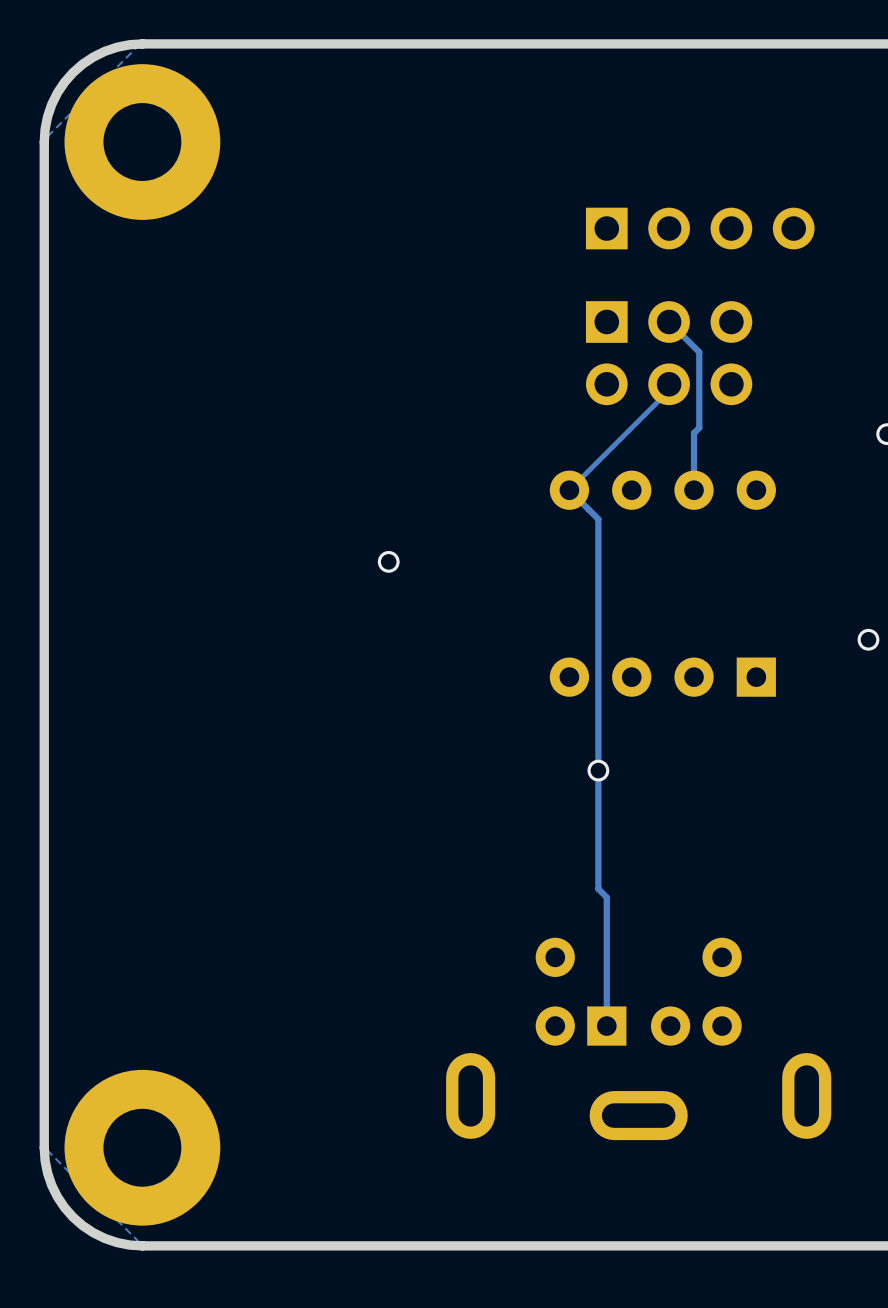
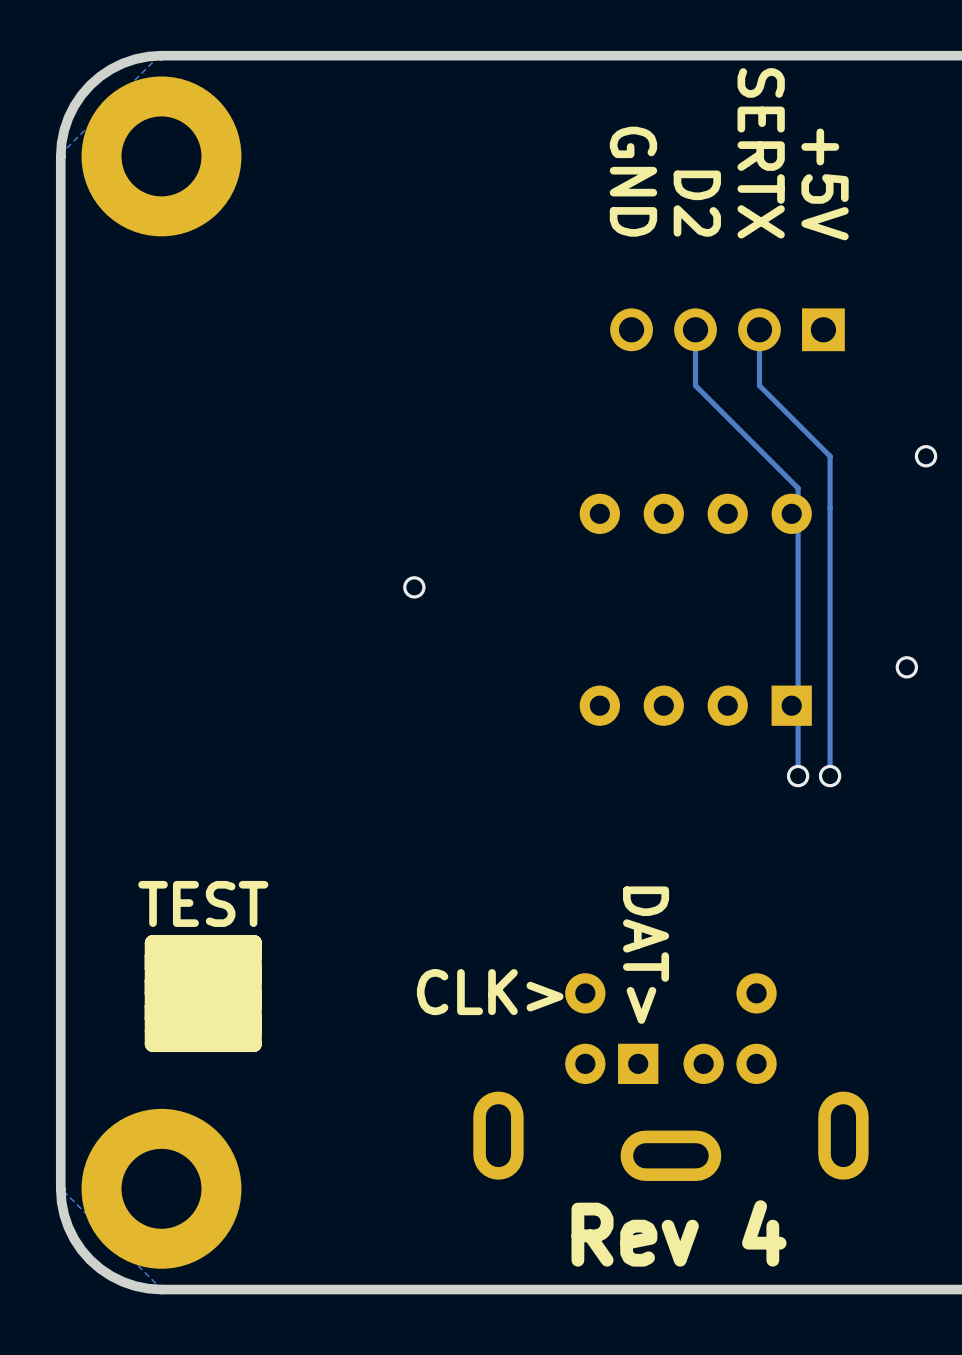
text: none -> SERTX (761, 153)
text: none -> GND (633, 181)
text: none -> +5V (825, 184)
text: none -> D2 (697, 203)
part rotation: 0° (700, 228) -> 180° (727, 329)
track: none -> (695, 329) (695, 385) (798, 488) (798, 776)
track: none -> (759, 329) (759, 385) (830, 456) (830, 776)
track: (669, 321) (699, 352) (699, 427) (694, 433) (694, 490) -> none
part: (669, 353) -> none
track: (669, 384) (669, 390) (569, 490) (598, 519) (598, 888) (606, 897) (606, 1026) -> none
via: none -> (798, 776)
via: none -> (830, 776)
via: (598, 770) -> none
text: none -> DAT> (646, 955)
text: none -> CLK> (490, 992)
TEST: none -> (203, 993)
text: none -> Rev 4 (679, 1233)

